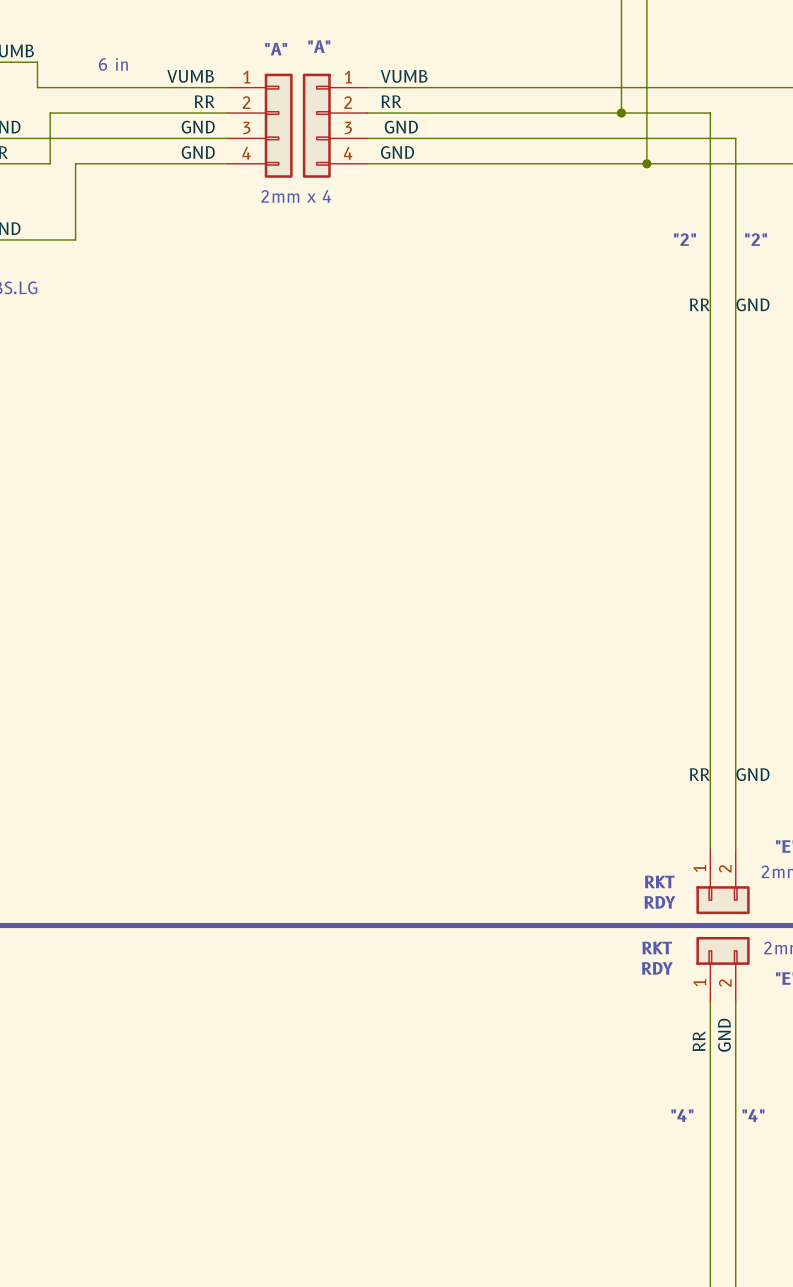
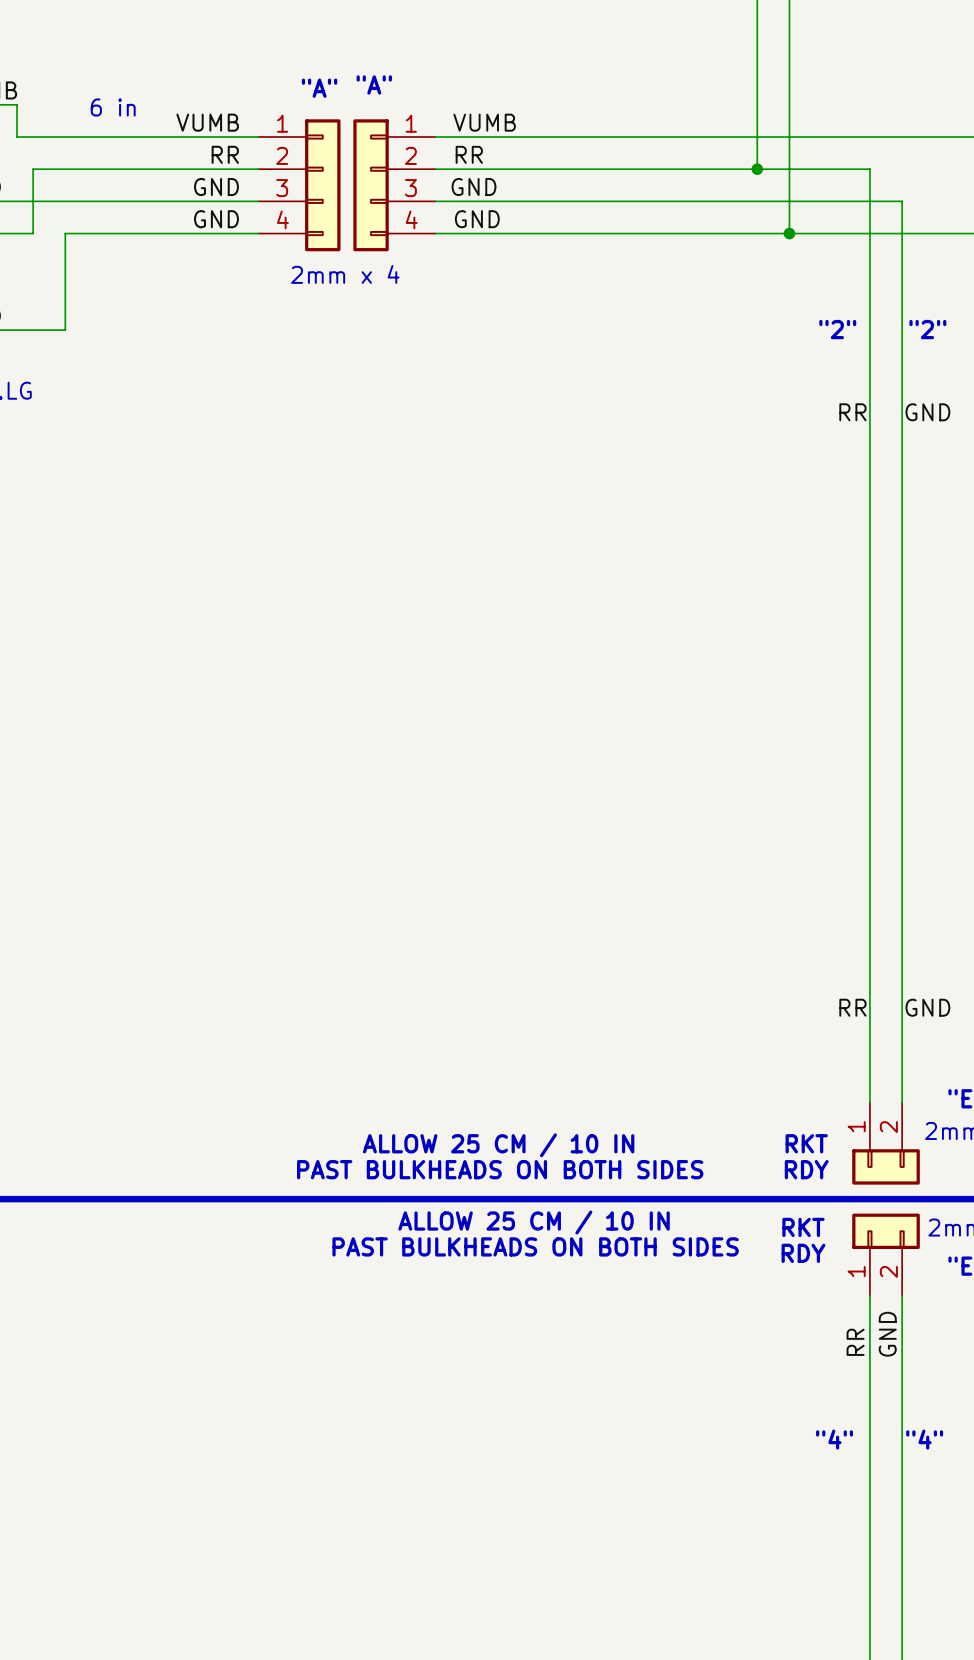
text: none -> ALLOW 25 CM / 10 IN (498, 1145)
text: none -> PAST BULKHEADS ON BOTH SIDES (500, 1169)
text: none -> ALLOW 25 CM / 10 IN (534, 1222)
text: none -> PAST BULKHEADS ON BOTH SIDES (535, 1246)

